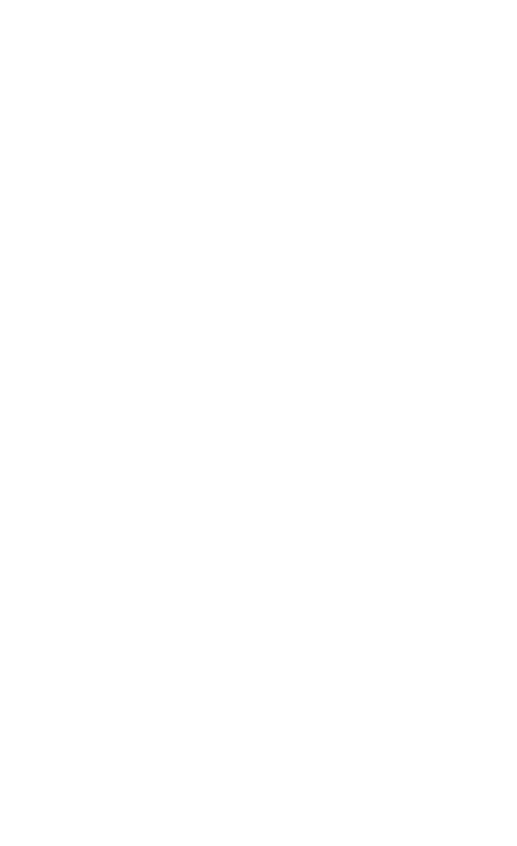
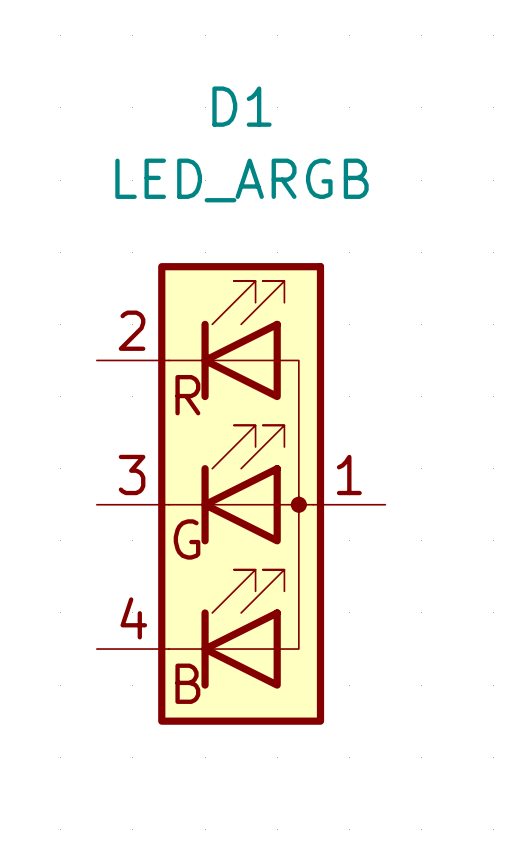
D1: none -> LED_ARGB (241, 493)

